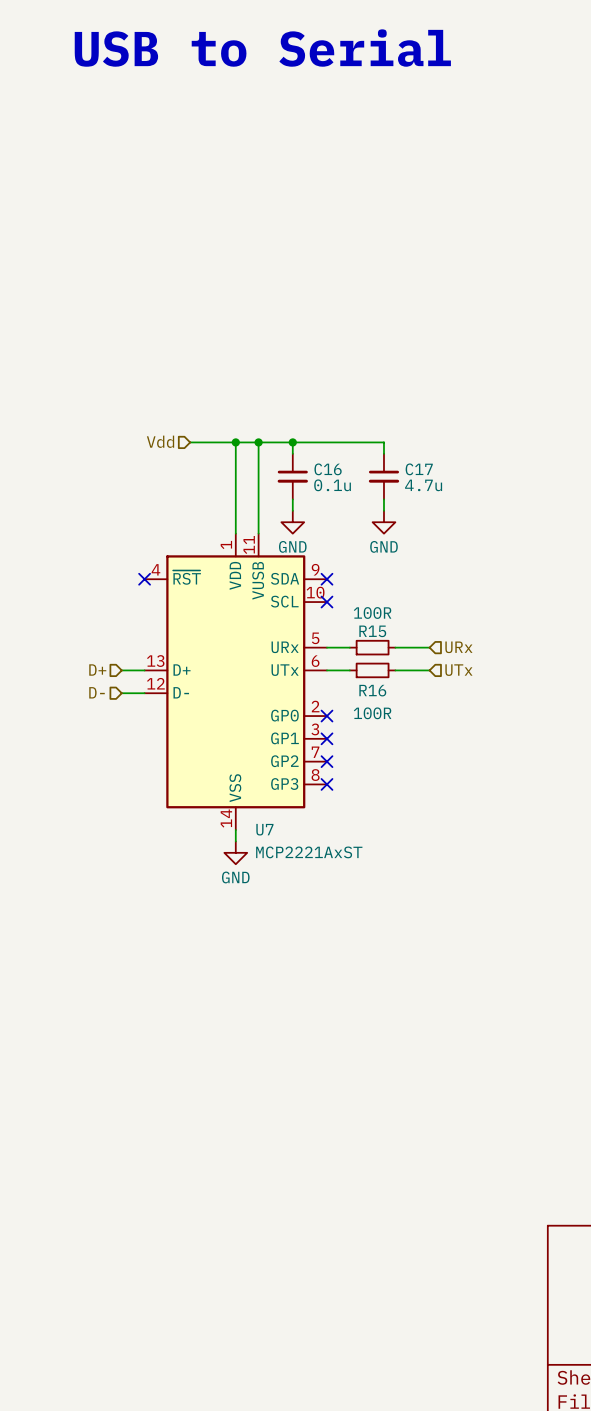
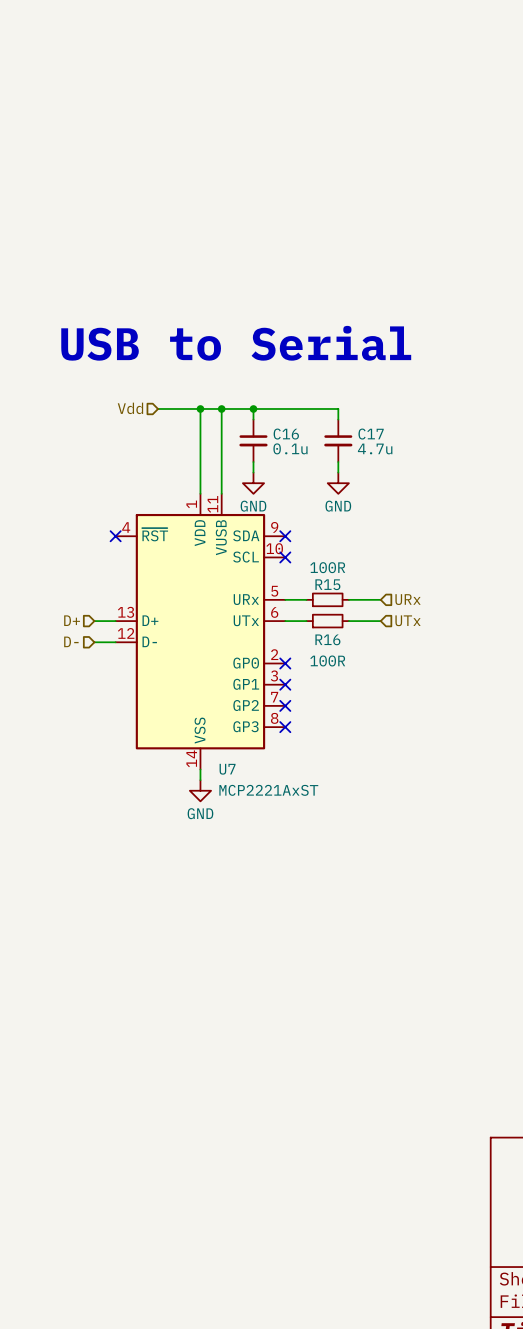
text: USB to Serial (262, 48) -> none
text: none -> USB to Serial (236, 343)

